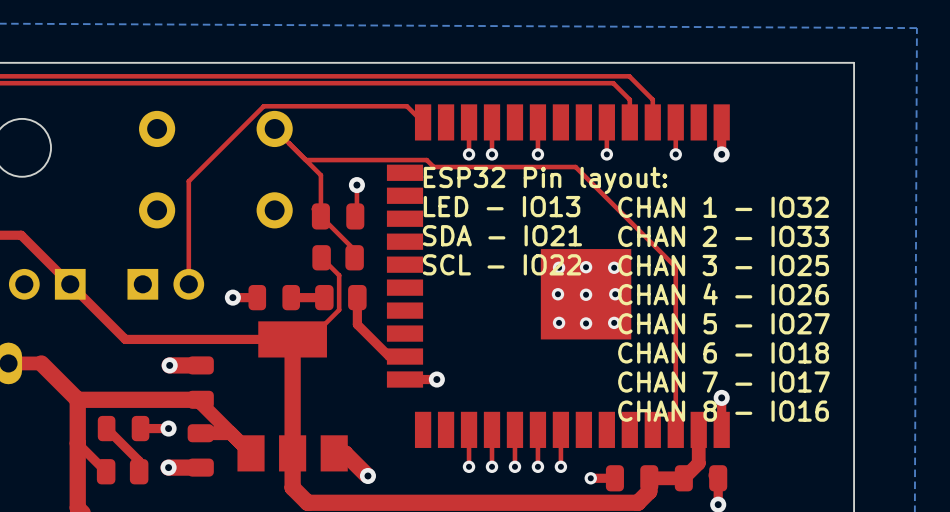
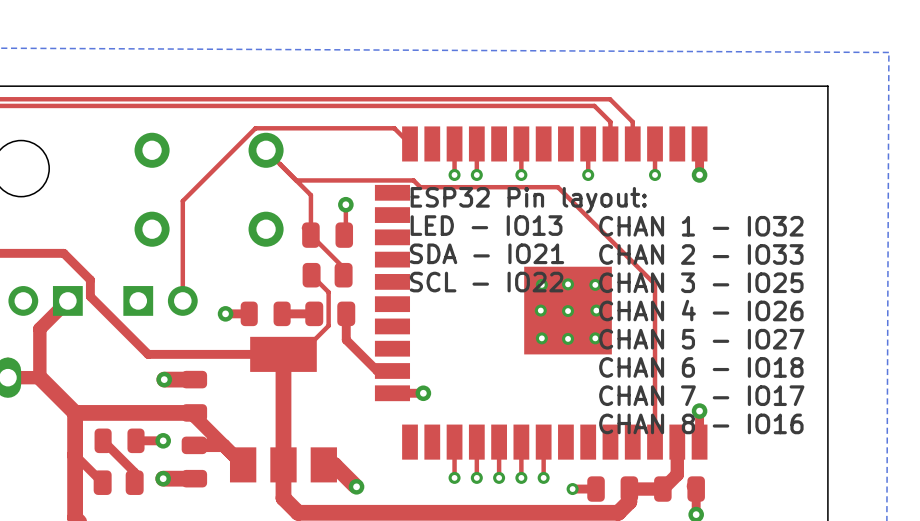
top track: (21, 235) (125, 339) (153, 339) -> (20, 253) (63, 253) (90, 279) (90, 296) (148, 354)
top track: none -> (67, 300) (39, 328) (39, 377)

